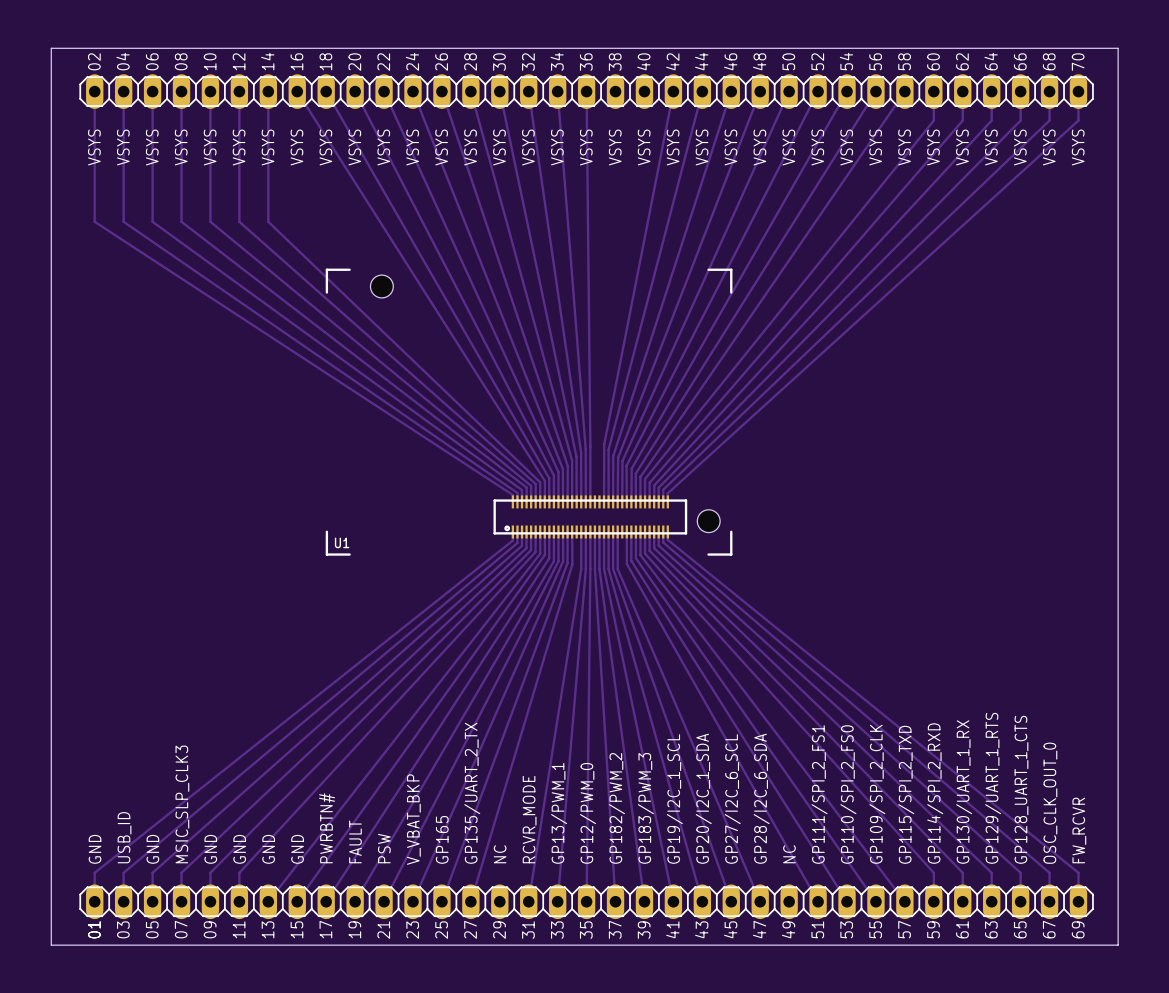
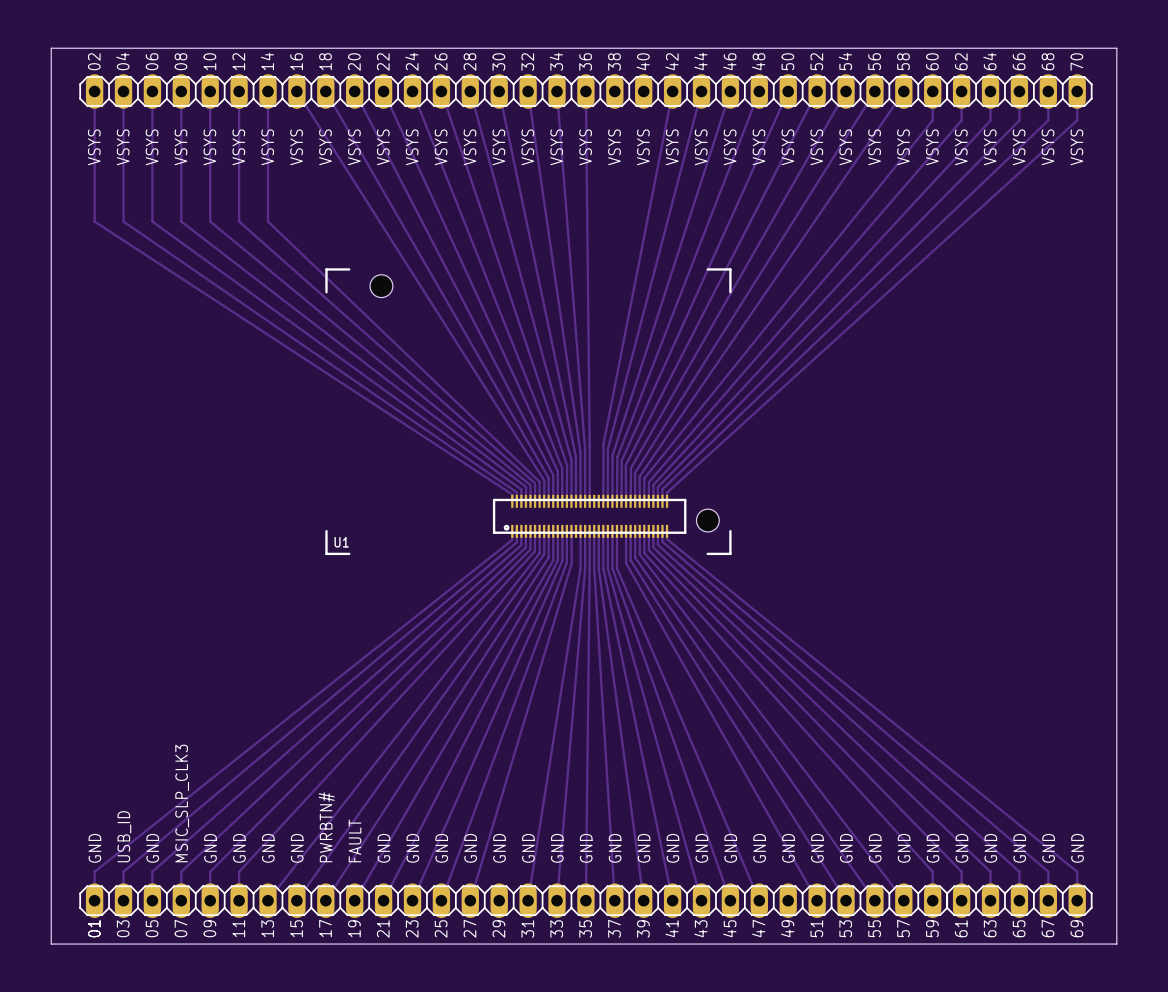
text: GP129/UART_1_RTS (993, 788) -> GND (990, 848)
text: GP128_UART_1_CTS (1021, 789) -> GND (1019, 848)
text: GP130/UART_1_RX (964, 792) -> GND (961, 848)
text: GP135/UART_2_TX (472, 793) -> GND (470, 848)
text: GP114/SPI_2_RXD (935, 793) -> GND (933, 848)
text: GP111/SPI_2_FS1 (819, 794) -> GND (817, 848)
text: GP110/SPI_2_FS0 (848, 794) -> GND (846, 848)
text: GP109/SPI_2_CLK (877, 794) -> GND (875, 848)
text: GP115/SPI_2_TXD (906, 794) -> GND (904, 848)
text: GP19/I2C_1_SCL (674, 798) -> GND (672, 848)
text: GP20/I2C_1_SDA (703, 798) -> GND (701, 848)
text: GP27/I2C_6_SCL (732, 798) -> GND (730, 848)
text: GP28/I2C_6_SDA (761, 798) -> GND (759, 848)
text: OSC_CLK_OUT_0 (1050, 803) -> GND (1048, 848)
text: GP182/PWM_2 (616, 808) -> GND (615, 848)
text: GP183/PWM_3 (645, 808) -> GND (644, 848)
text: GP13/PWM_1 (559, 813) -> GND (557, 848)
text: GP12/PWM_0 (588, 813) -> GND (586, 848)
text: V_VBAT_BKP (413, 819) -> GND (412, 848)
text: RCVR_MODE (529, 819) -> GND (528, 848)
text: FW_RCVR (1079, 830) -> GND (1077, 848)
text: GP165 (442, 839) -> GND (441, 848)
text: PSW (384, 848) -> GND (383, 848)
text: NC (500, 854) -> GND (499, 848)
text: NC (789, 854) -> GND (788, 848)

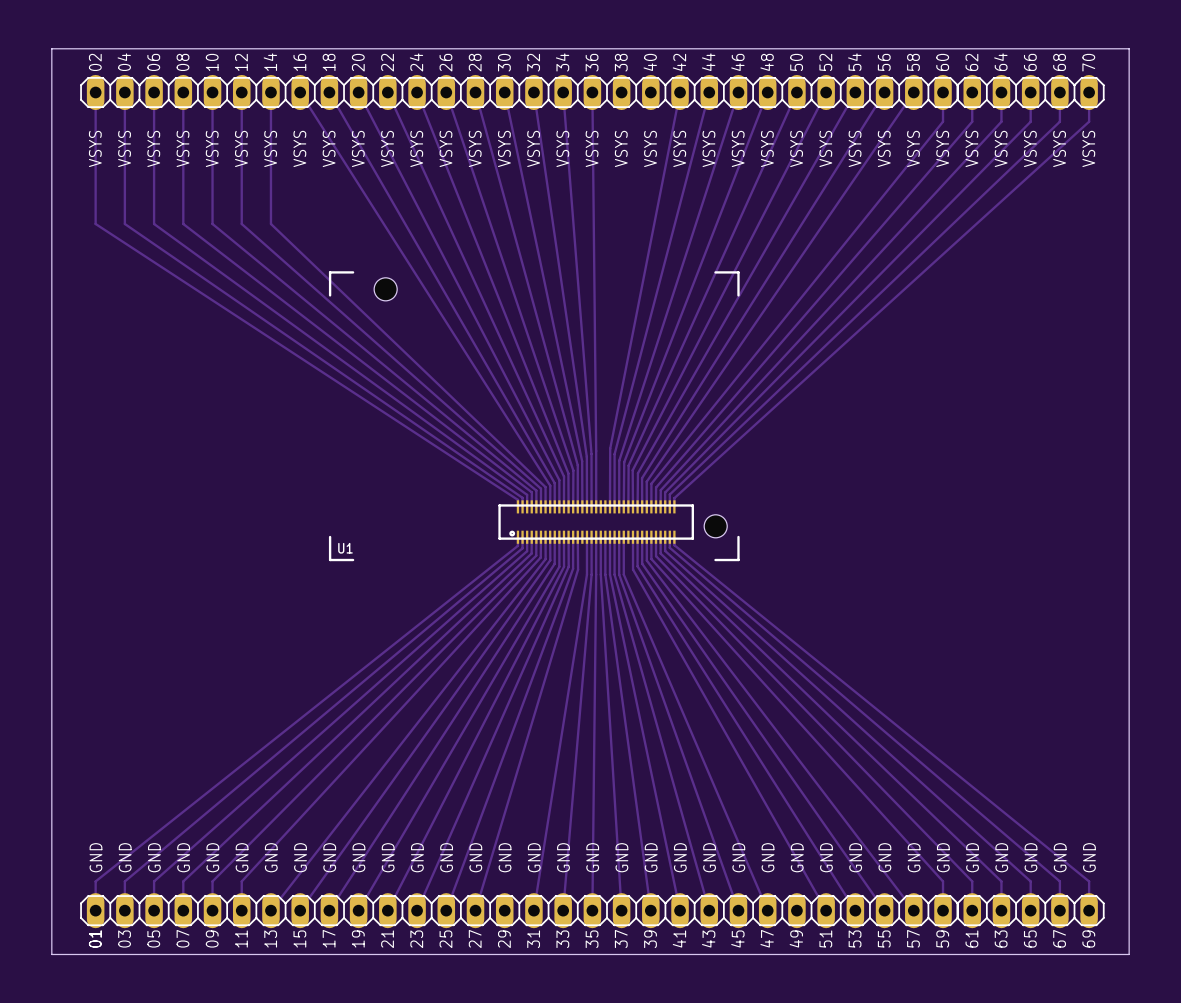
text: MSIC_SLP_CLK3 (182, 803) -> GND (183, 857)
text: PWRBTN# (326, 827) -> GND (329, 857)
text: USB_ID (124, 836) -> GND (125, 857)
text: FAULT (355, 840) -> GND (358, 857)

